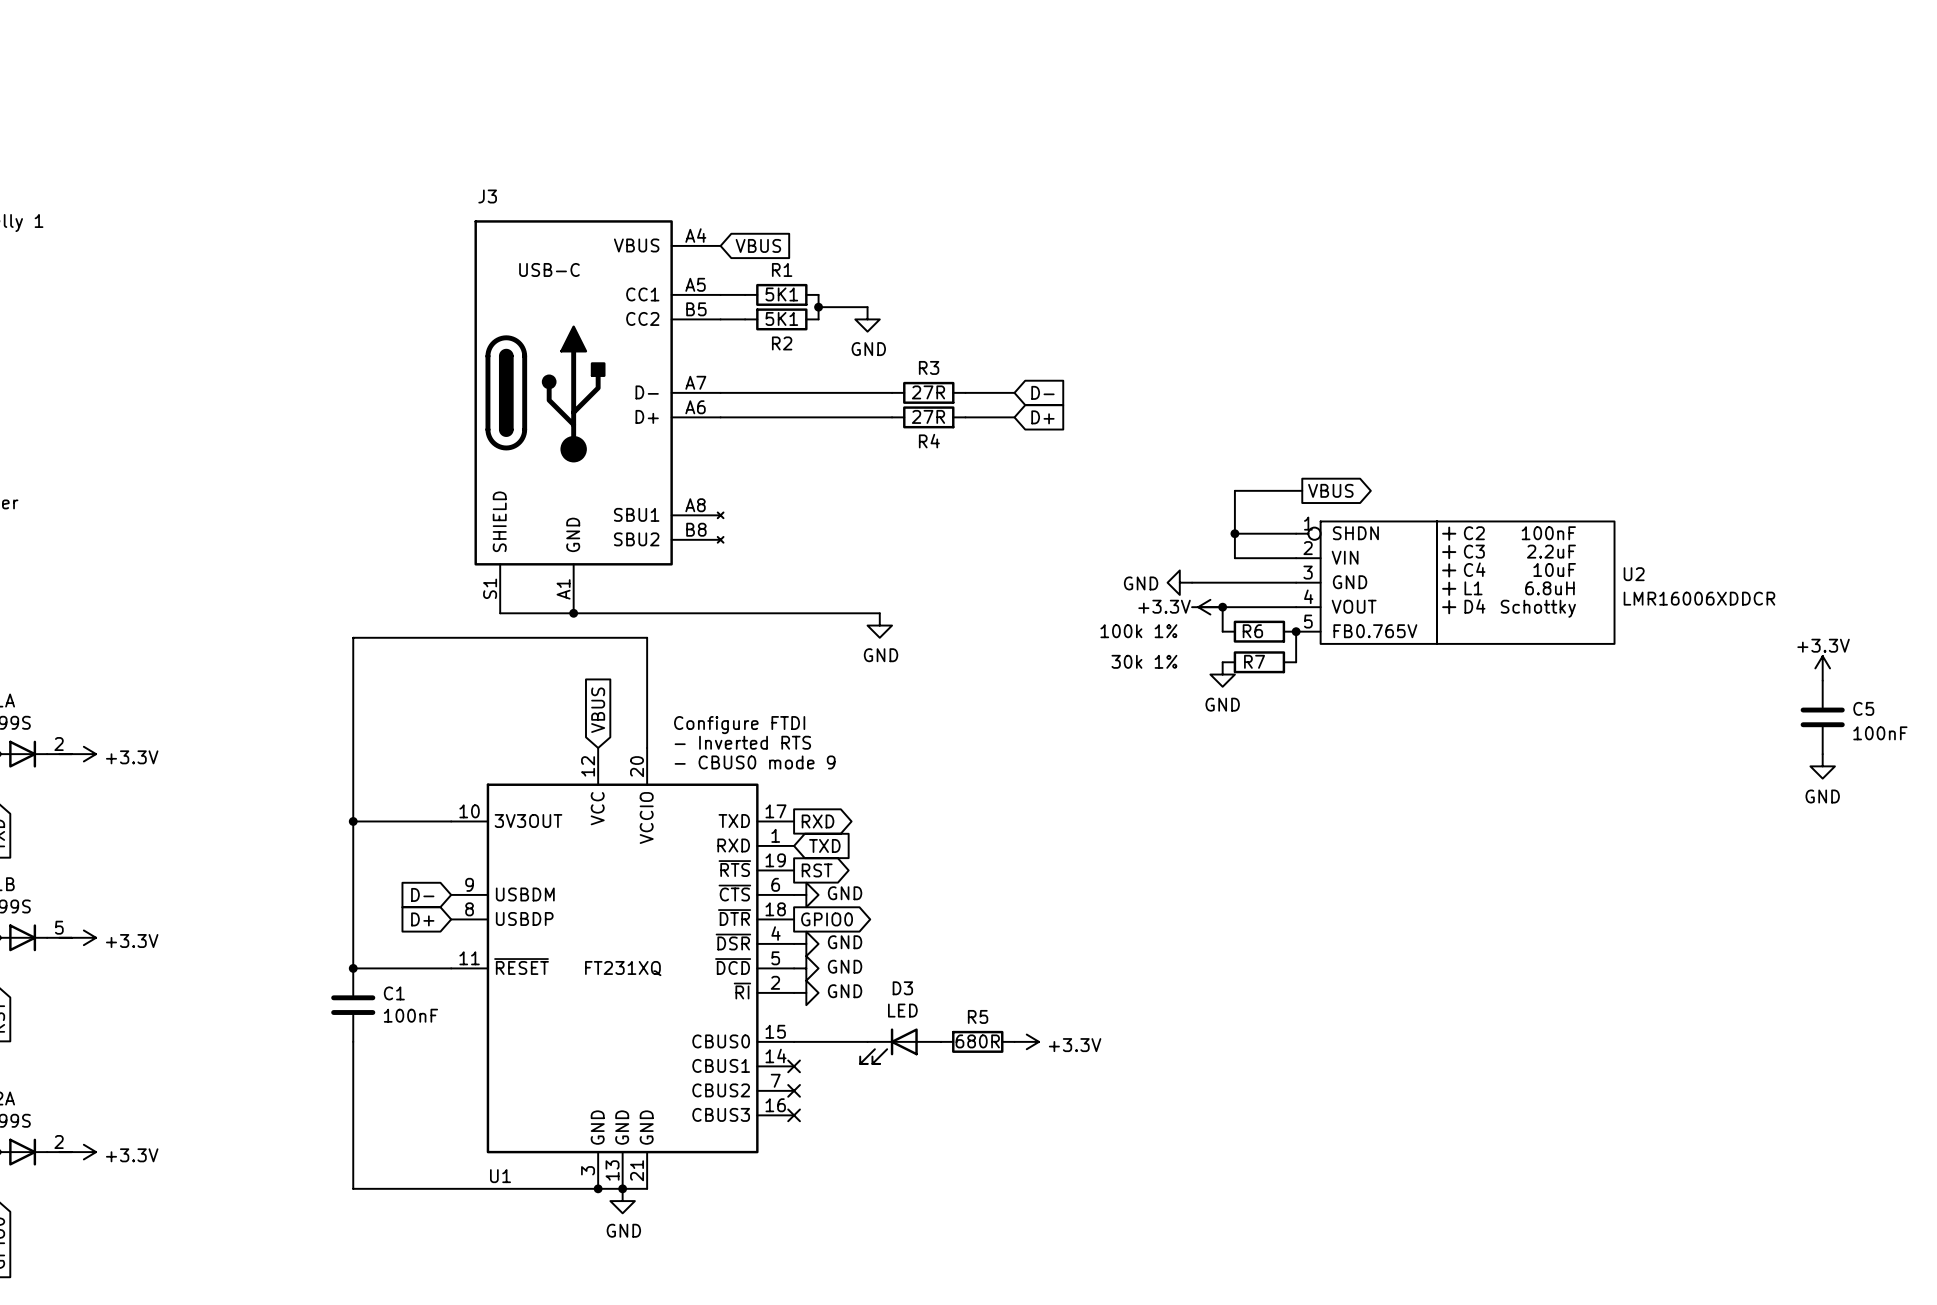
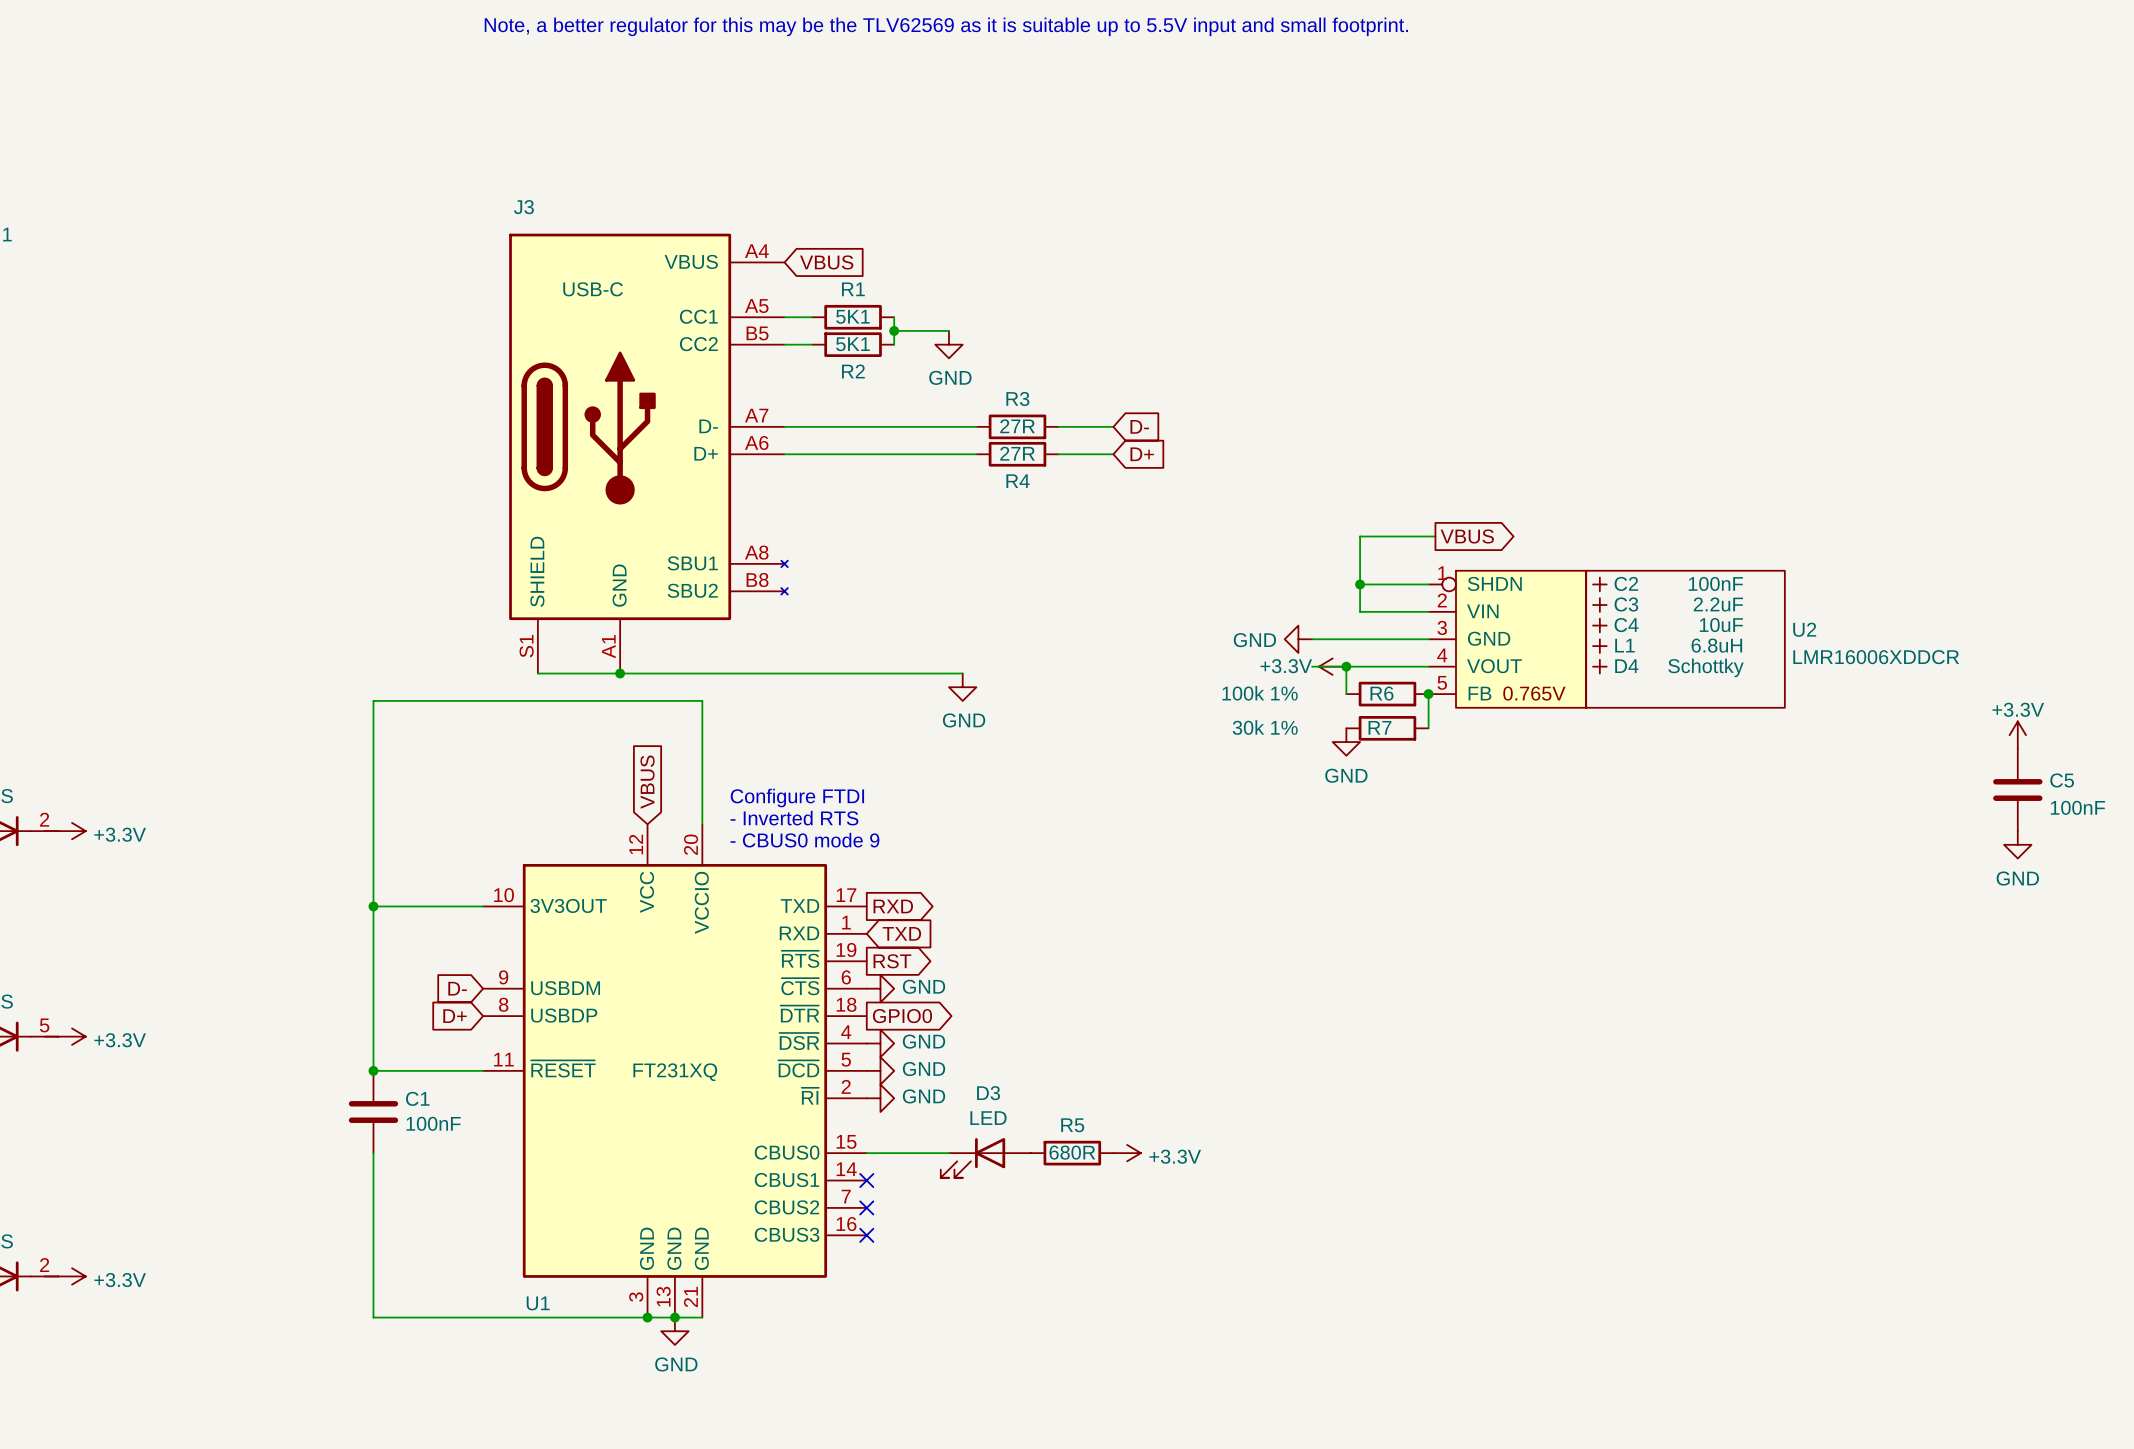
text: none -> Note, a better regulator for this may be the TLV62569 as it is suitable up to 5.5V input and small footprint. (946, 26)

